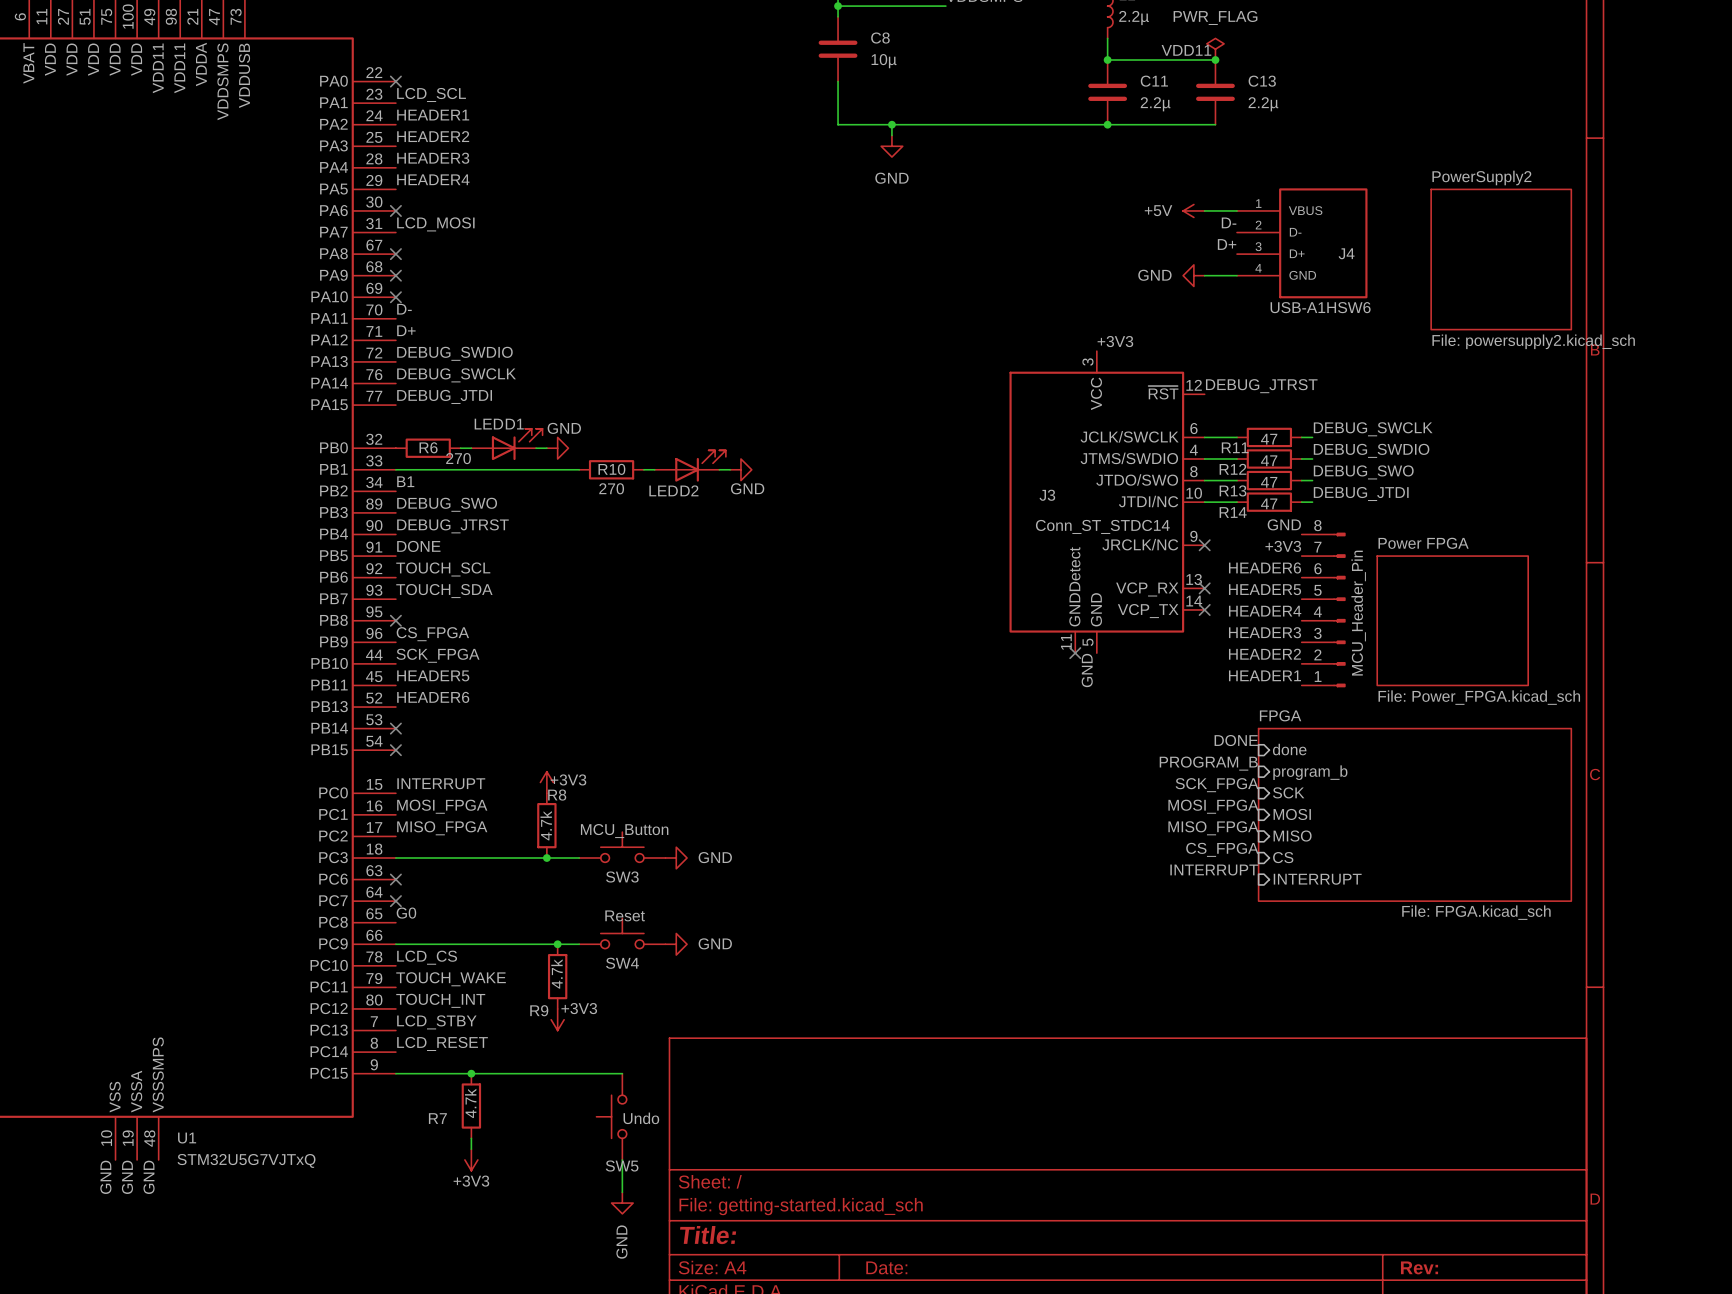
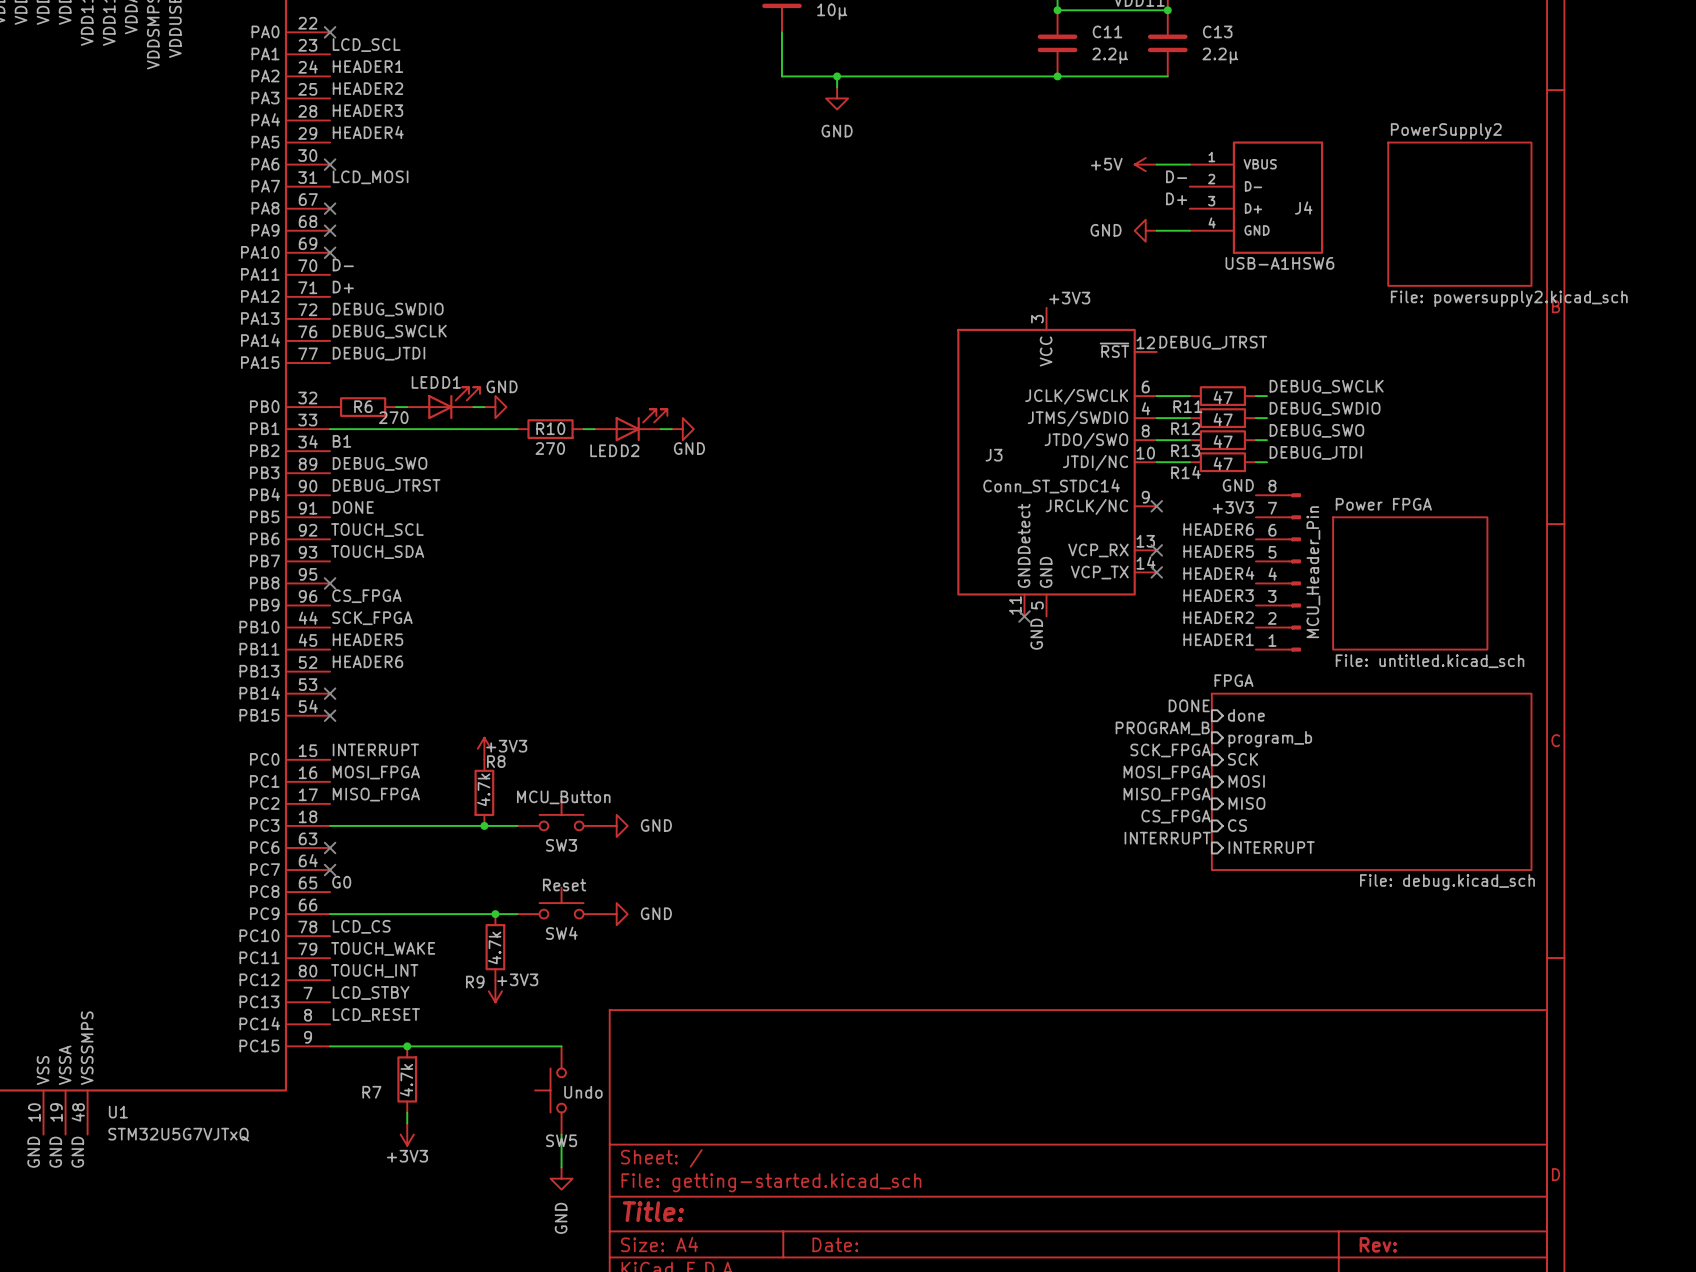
sheet Power FPGA value: File: Power_FPGA.kicad_sch (1479, 697) -> File: untitled.kicad_sch (1430, 661)
sheet FPGA value: File: FPGA.kicad_sch (1476, 912) -> File: debug.kicad_sch (1447, 882)

